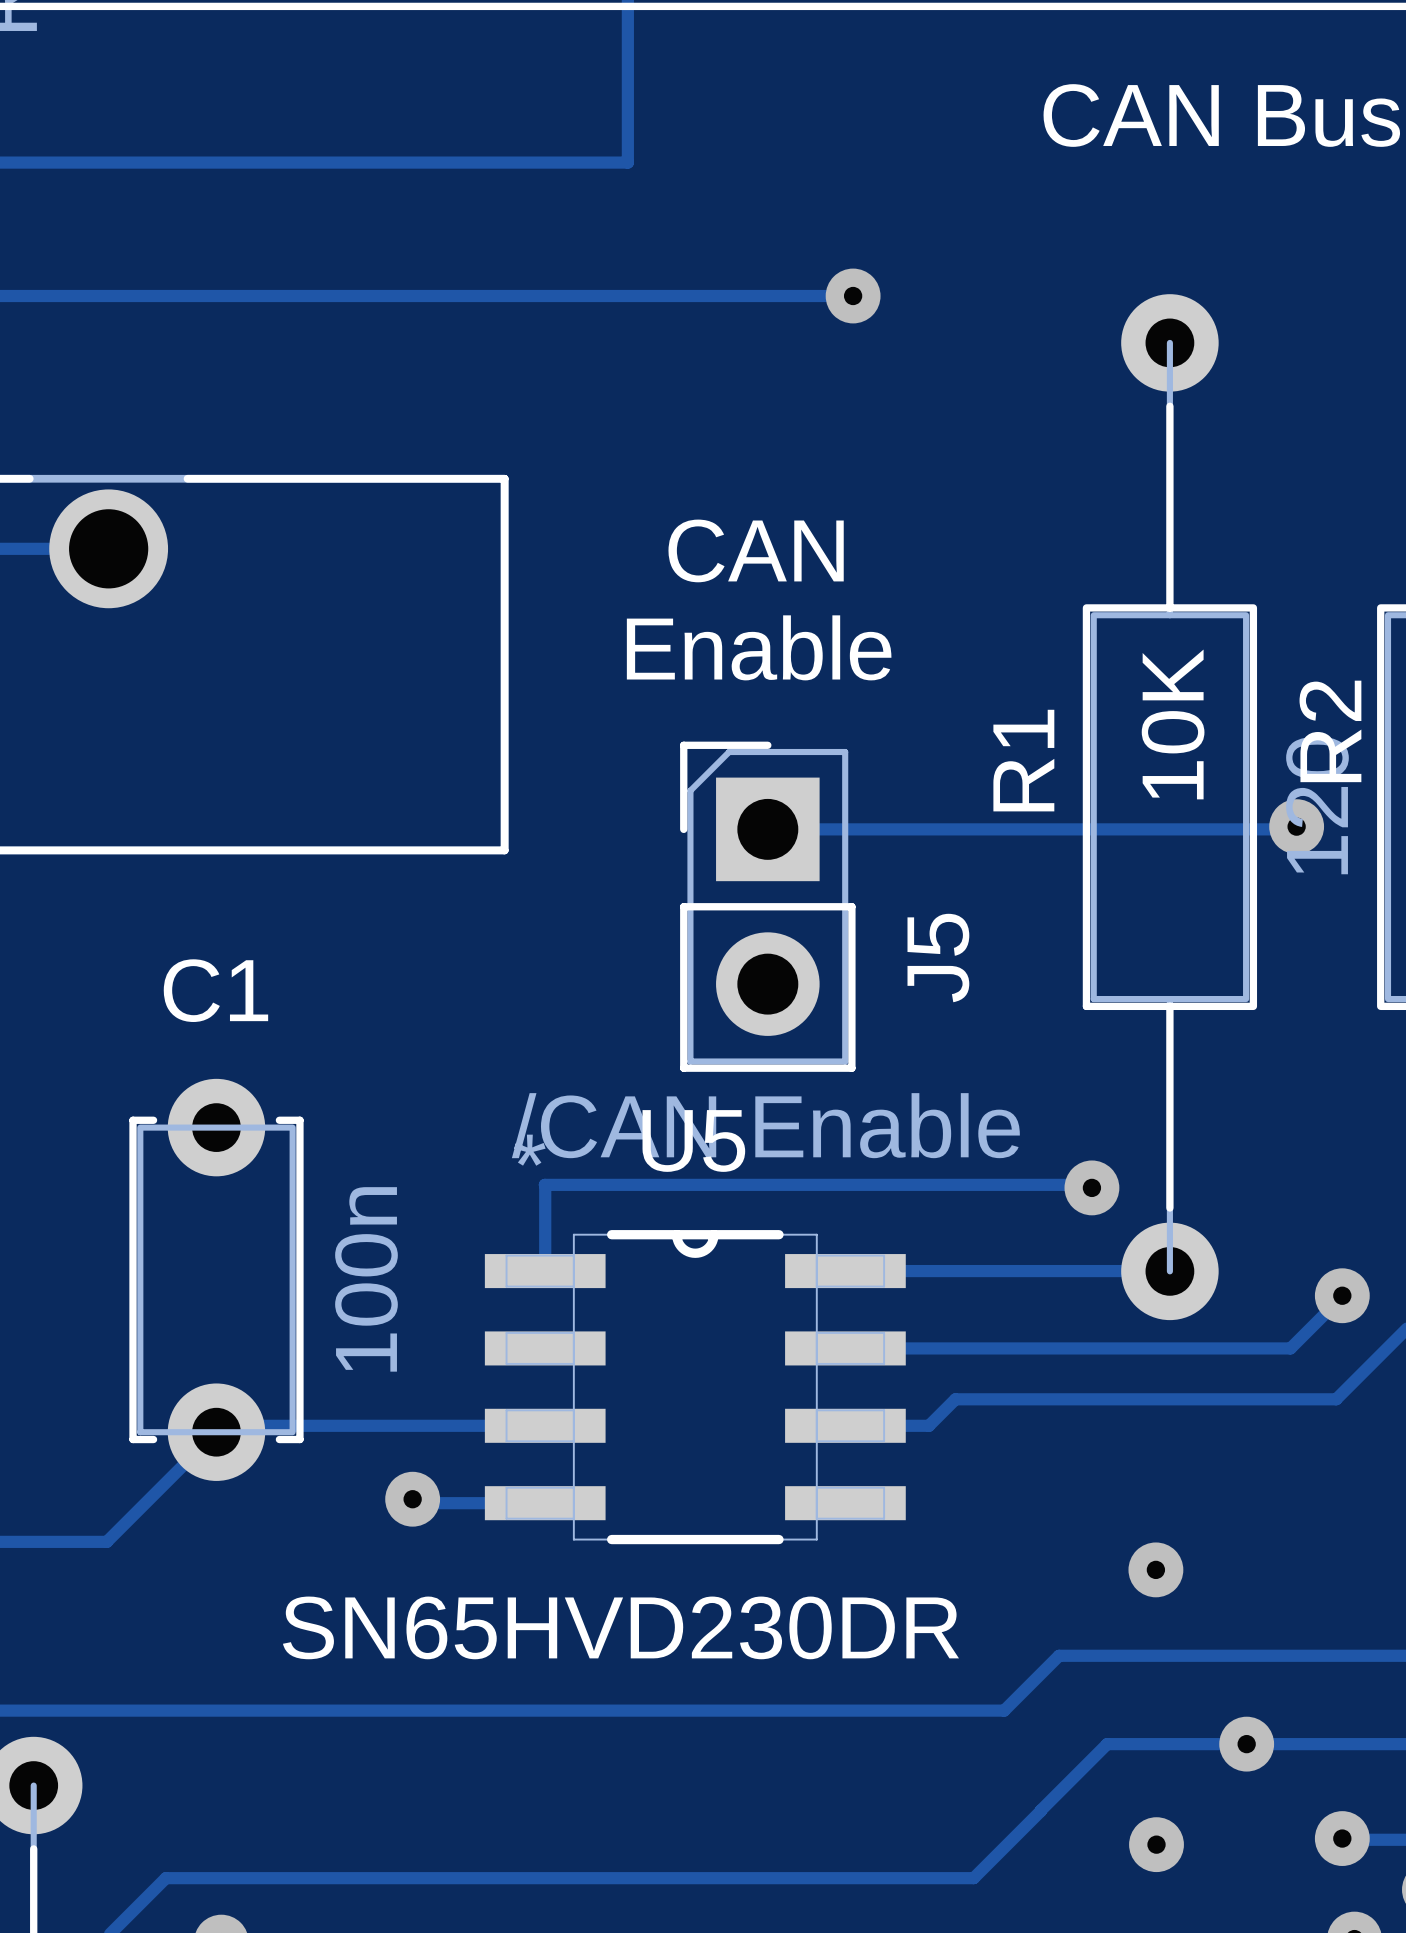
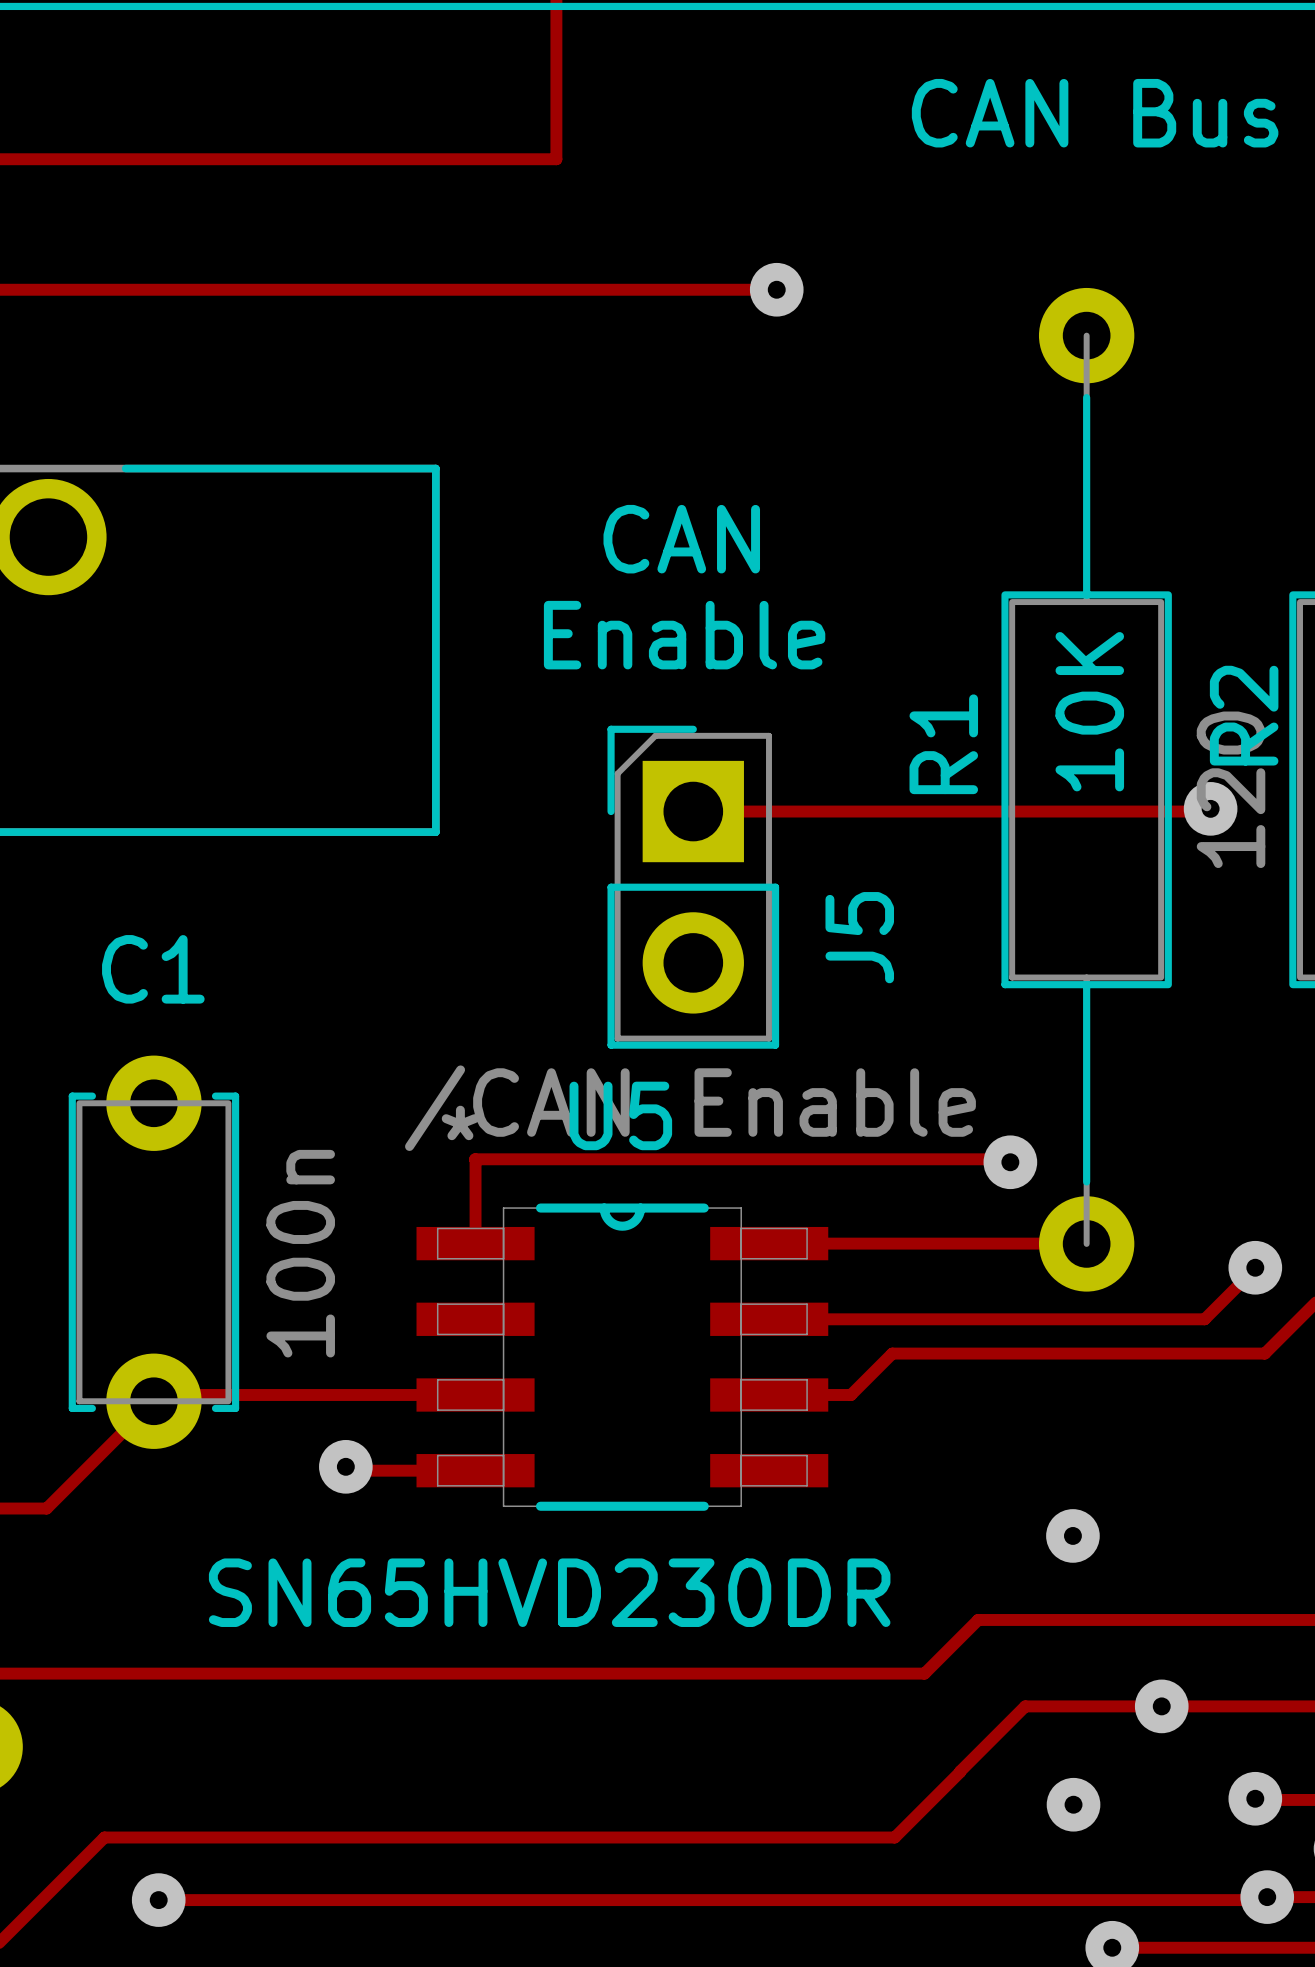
track: (1352, 1383) (1336, 1399) (955, 1399) -> (1264, 1353) (892, 1353) (876, 1369)

